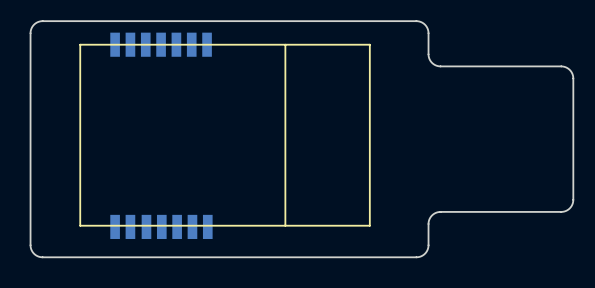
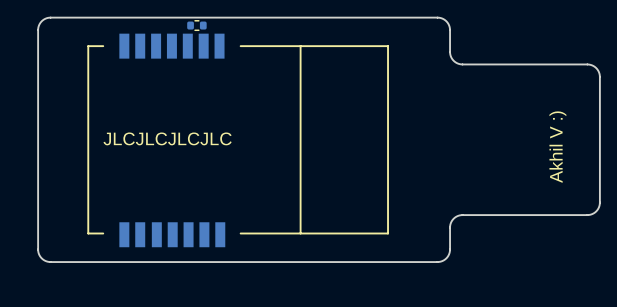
part: none -> (196, 25)
part footprint: [79, 32, 371, 239] -> [87, 33, 389, 248]
text: none -> Akhil V :) (557, 147)
text: none -> JLCJLCJLCJLC (167, 138)

